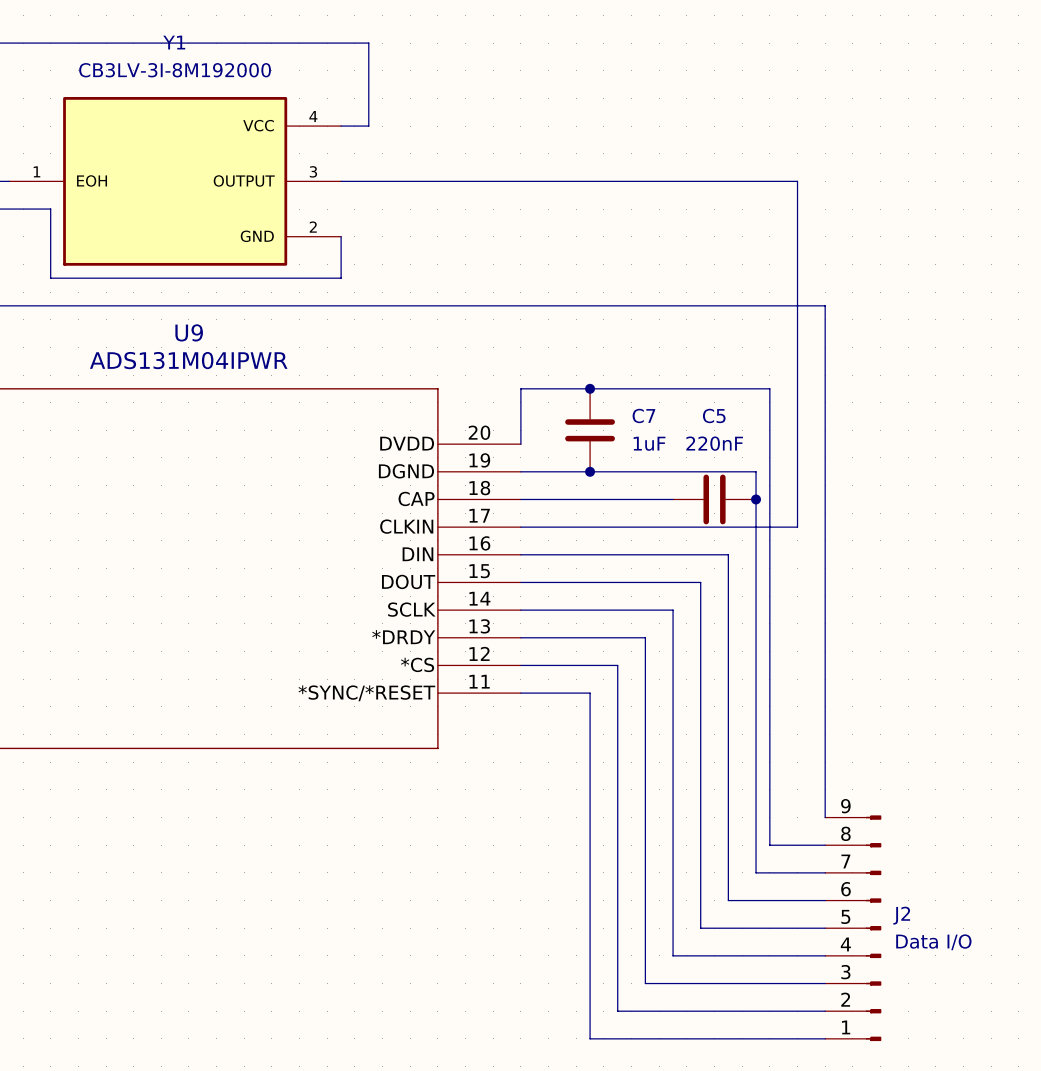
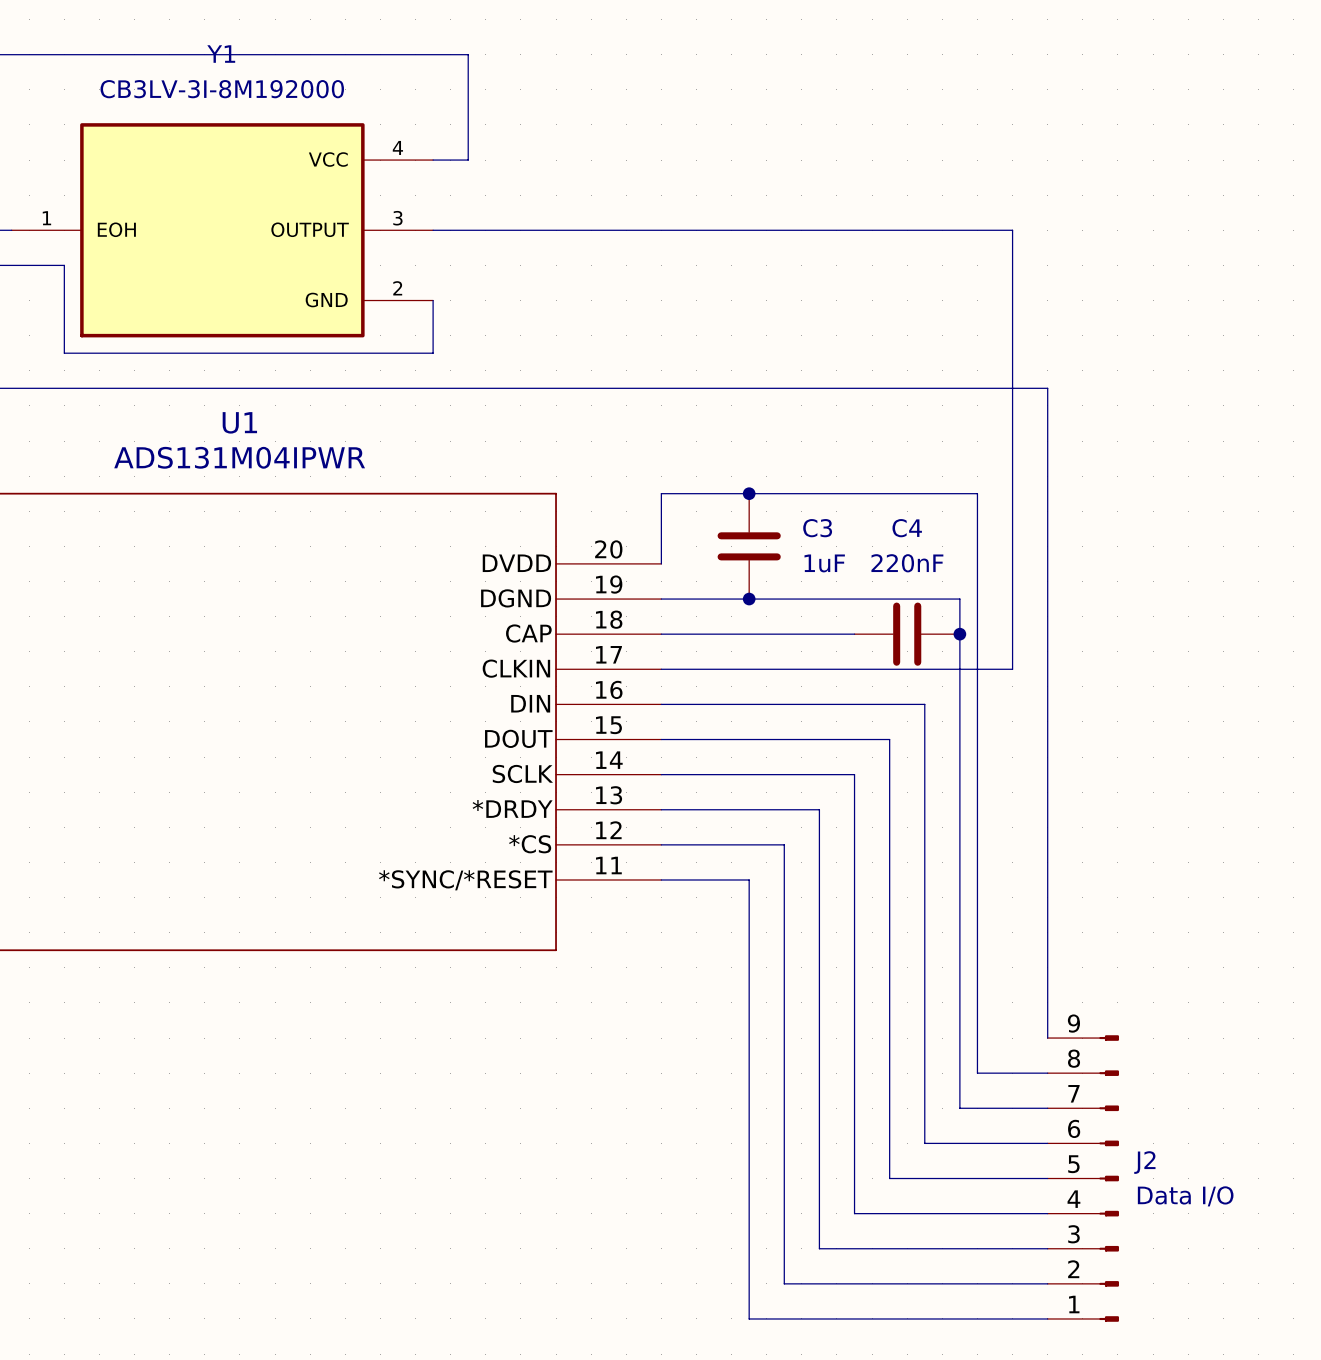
U9 name: U9 (189, 332) -> U1 (239, 422)
C7 name: C7 (643, 415) -> C3 (817, 528)
C5 name: C5 (714, 415) -> C4 (907, 528)

